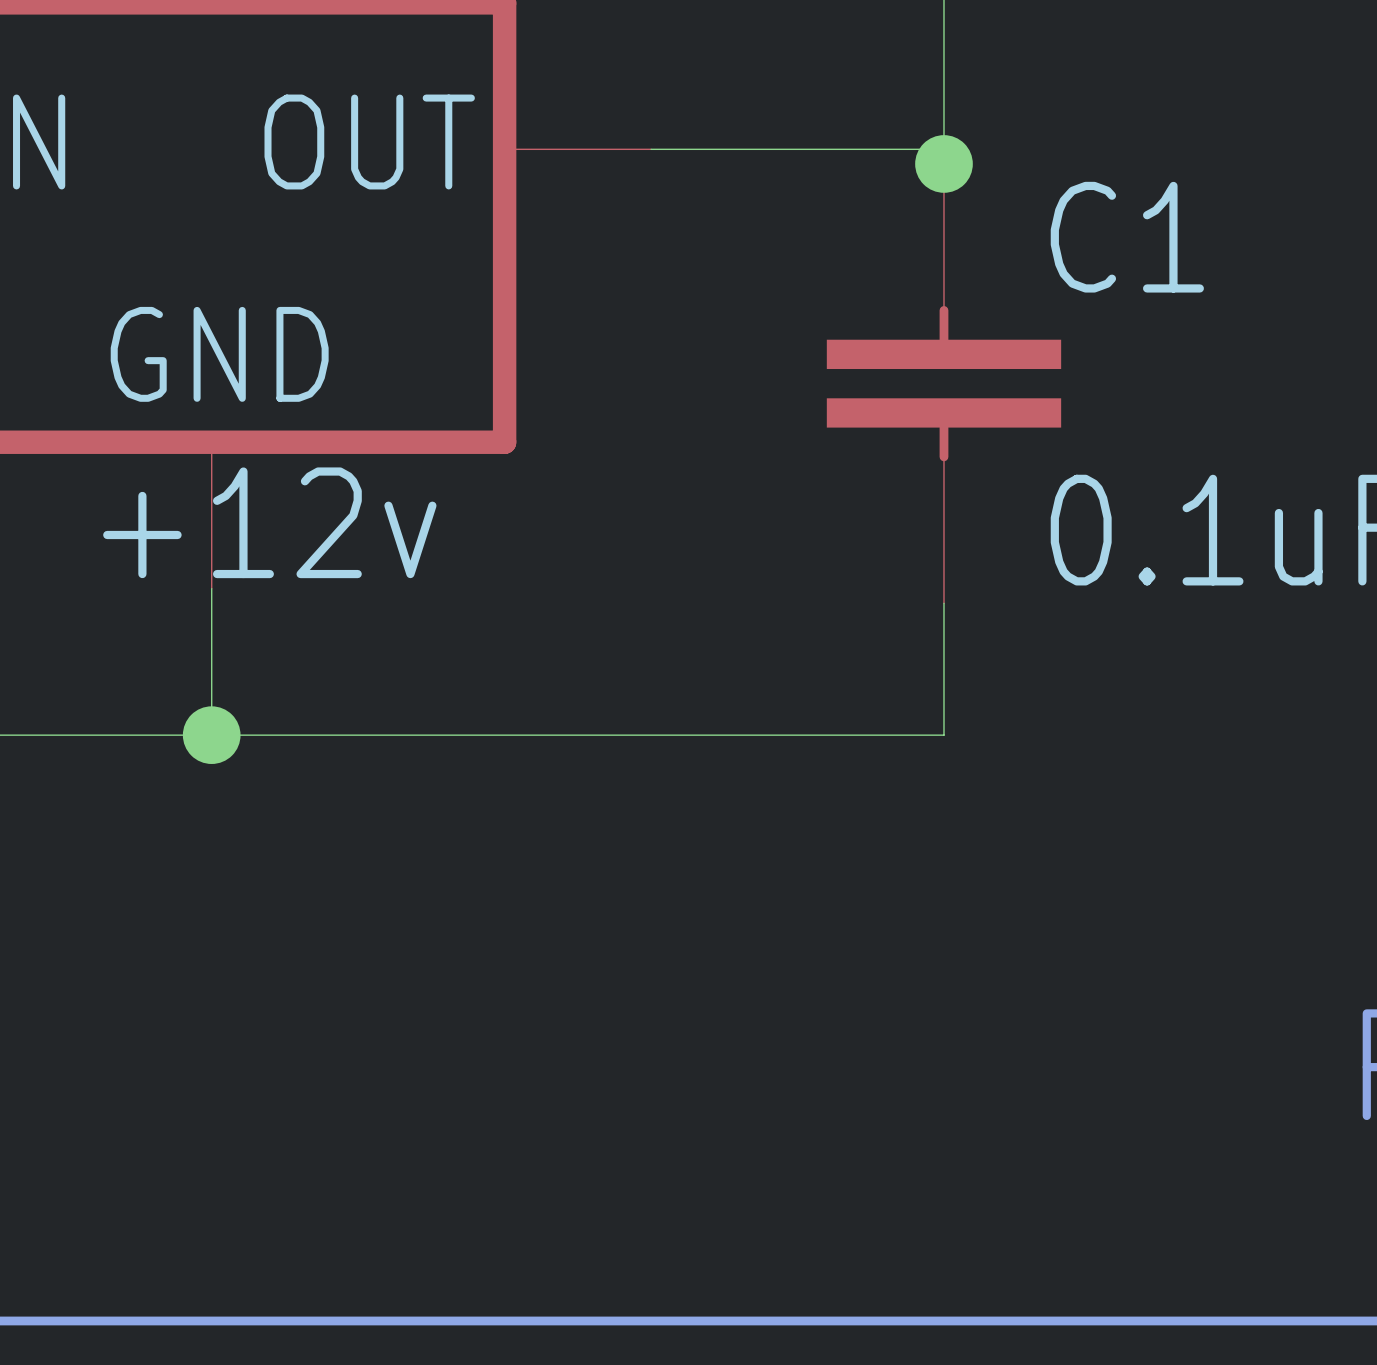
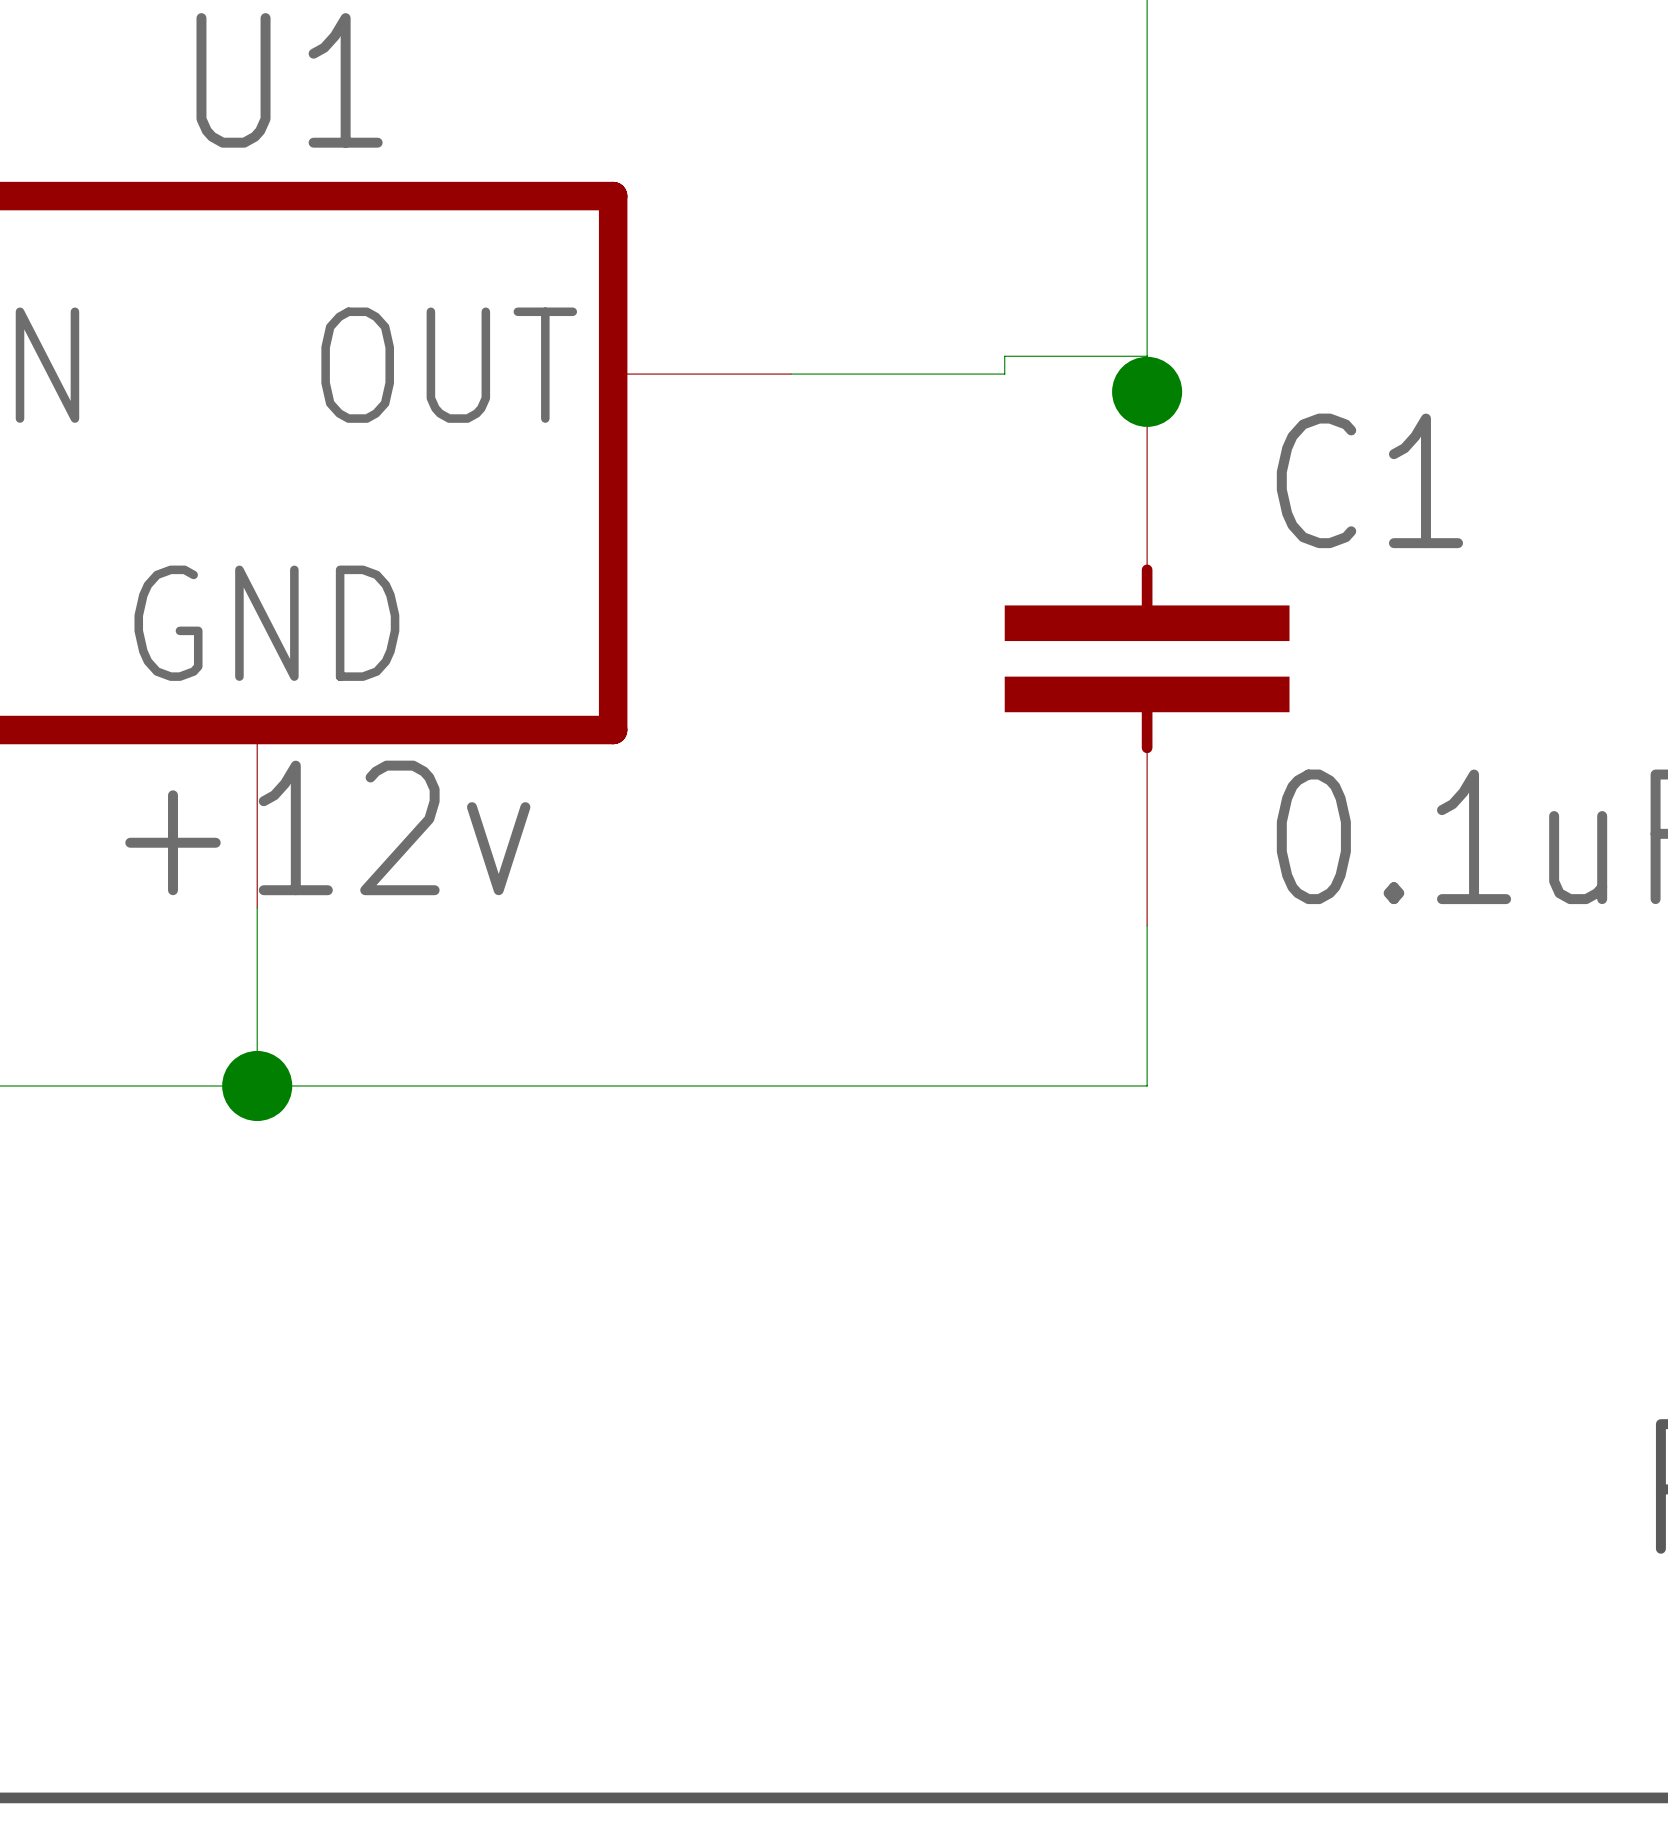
wire: (826, 149) (943, 149) -> (1004, 374) (1004, 356) (1147, 356)

